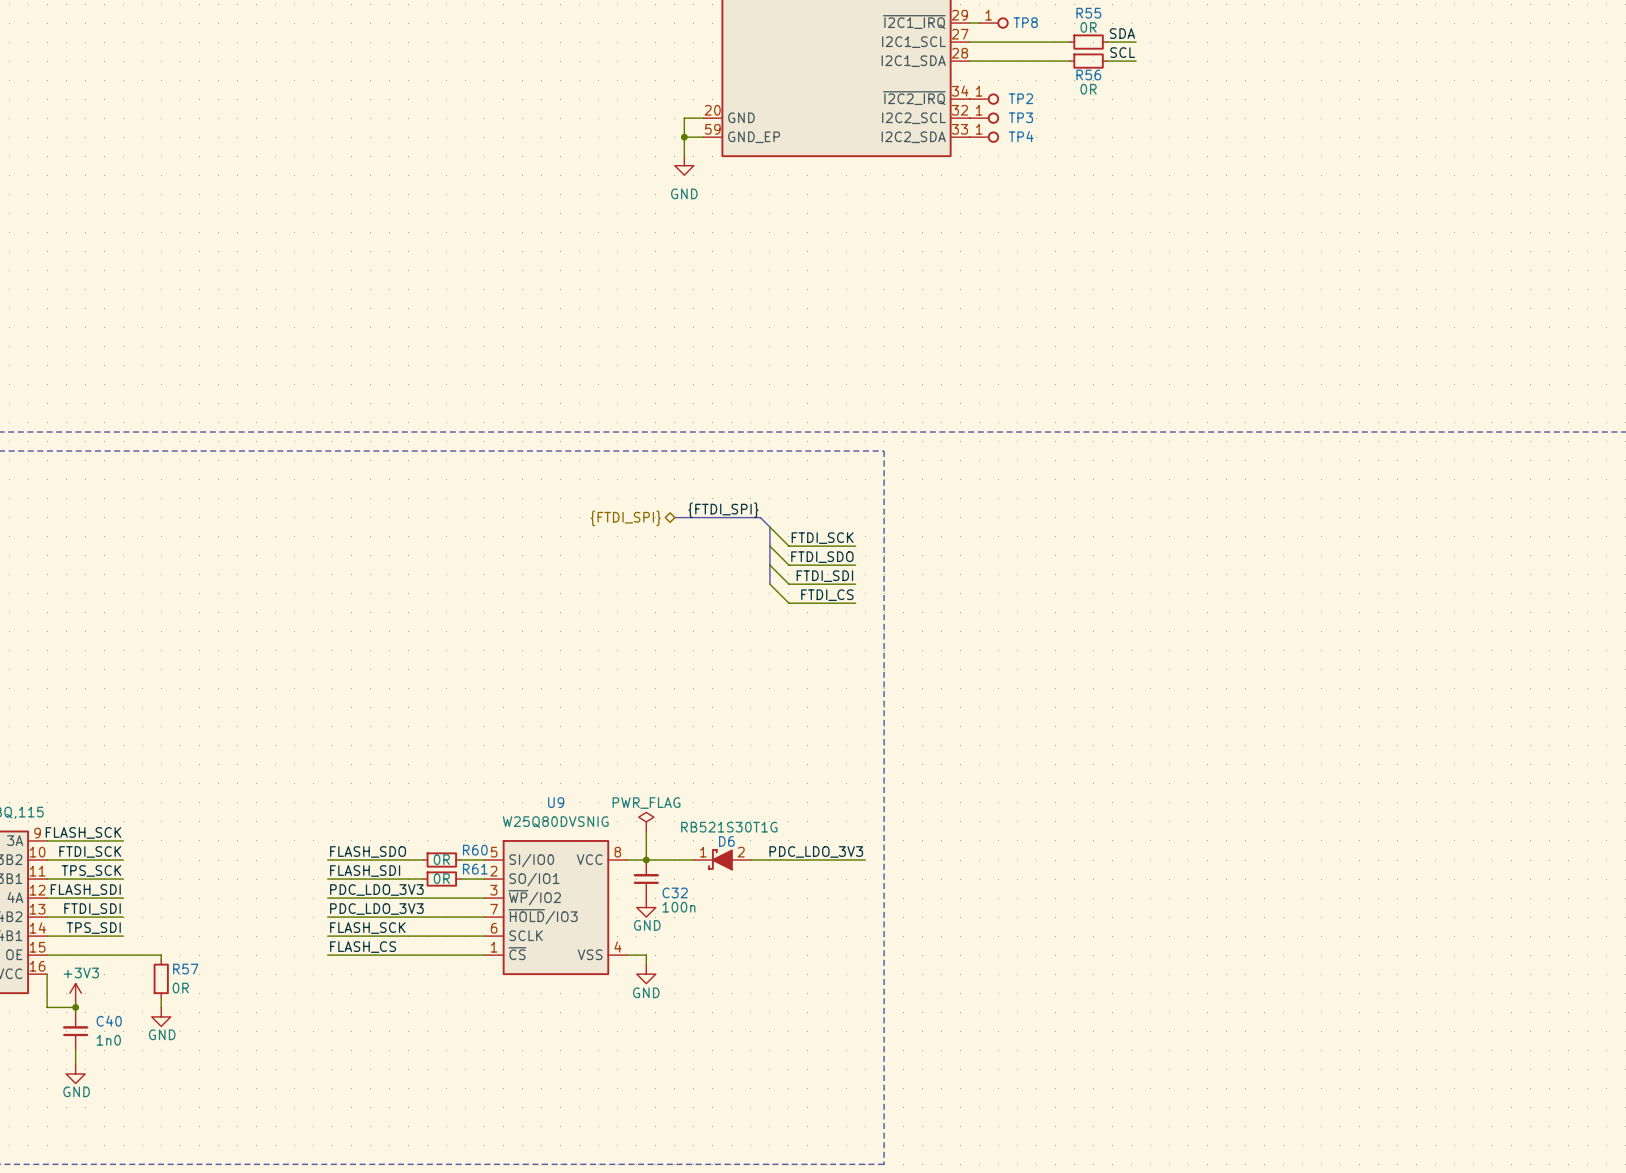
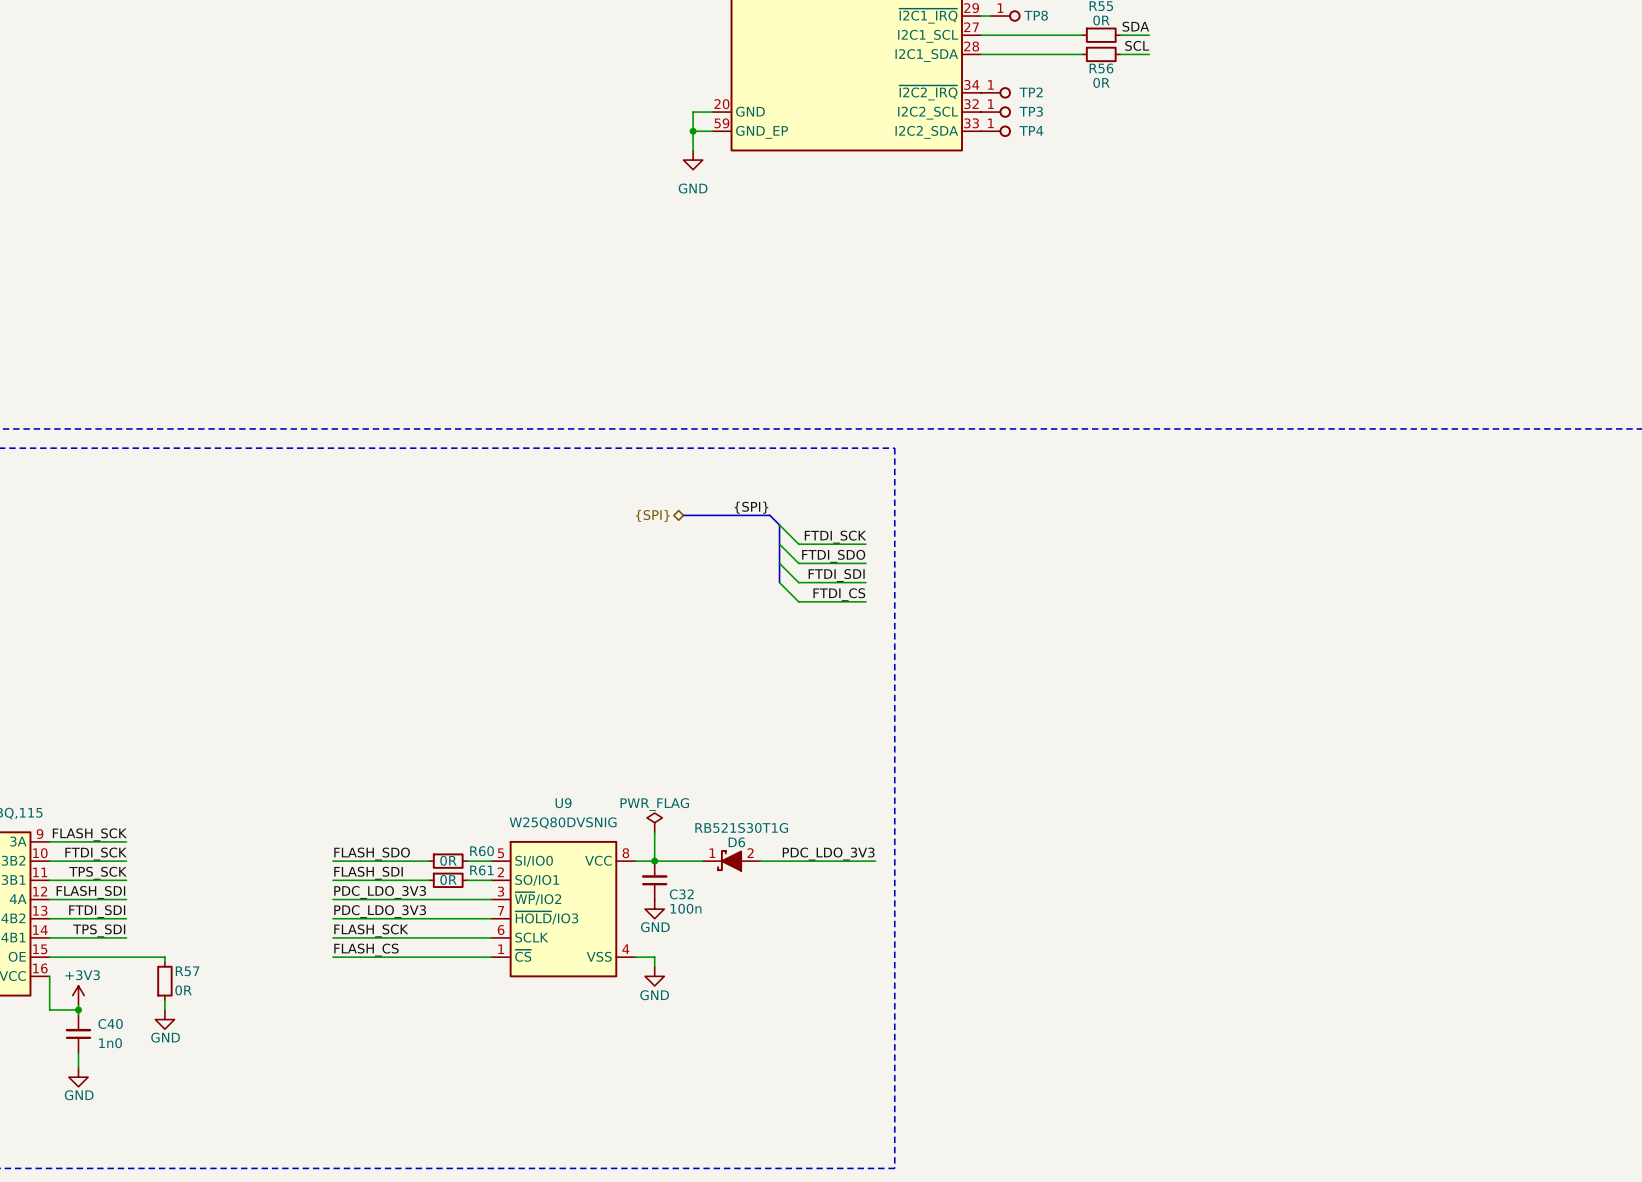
label: {FTDI_SPI} (723, 510) -> {SPI} (751, 507)
hierarchical label: {FTDI_SPI} (625, 518) -> {SPI} (652, 515)

